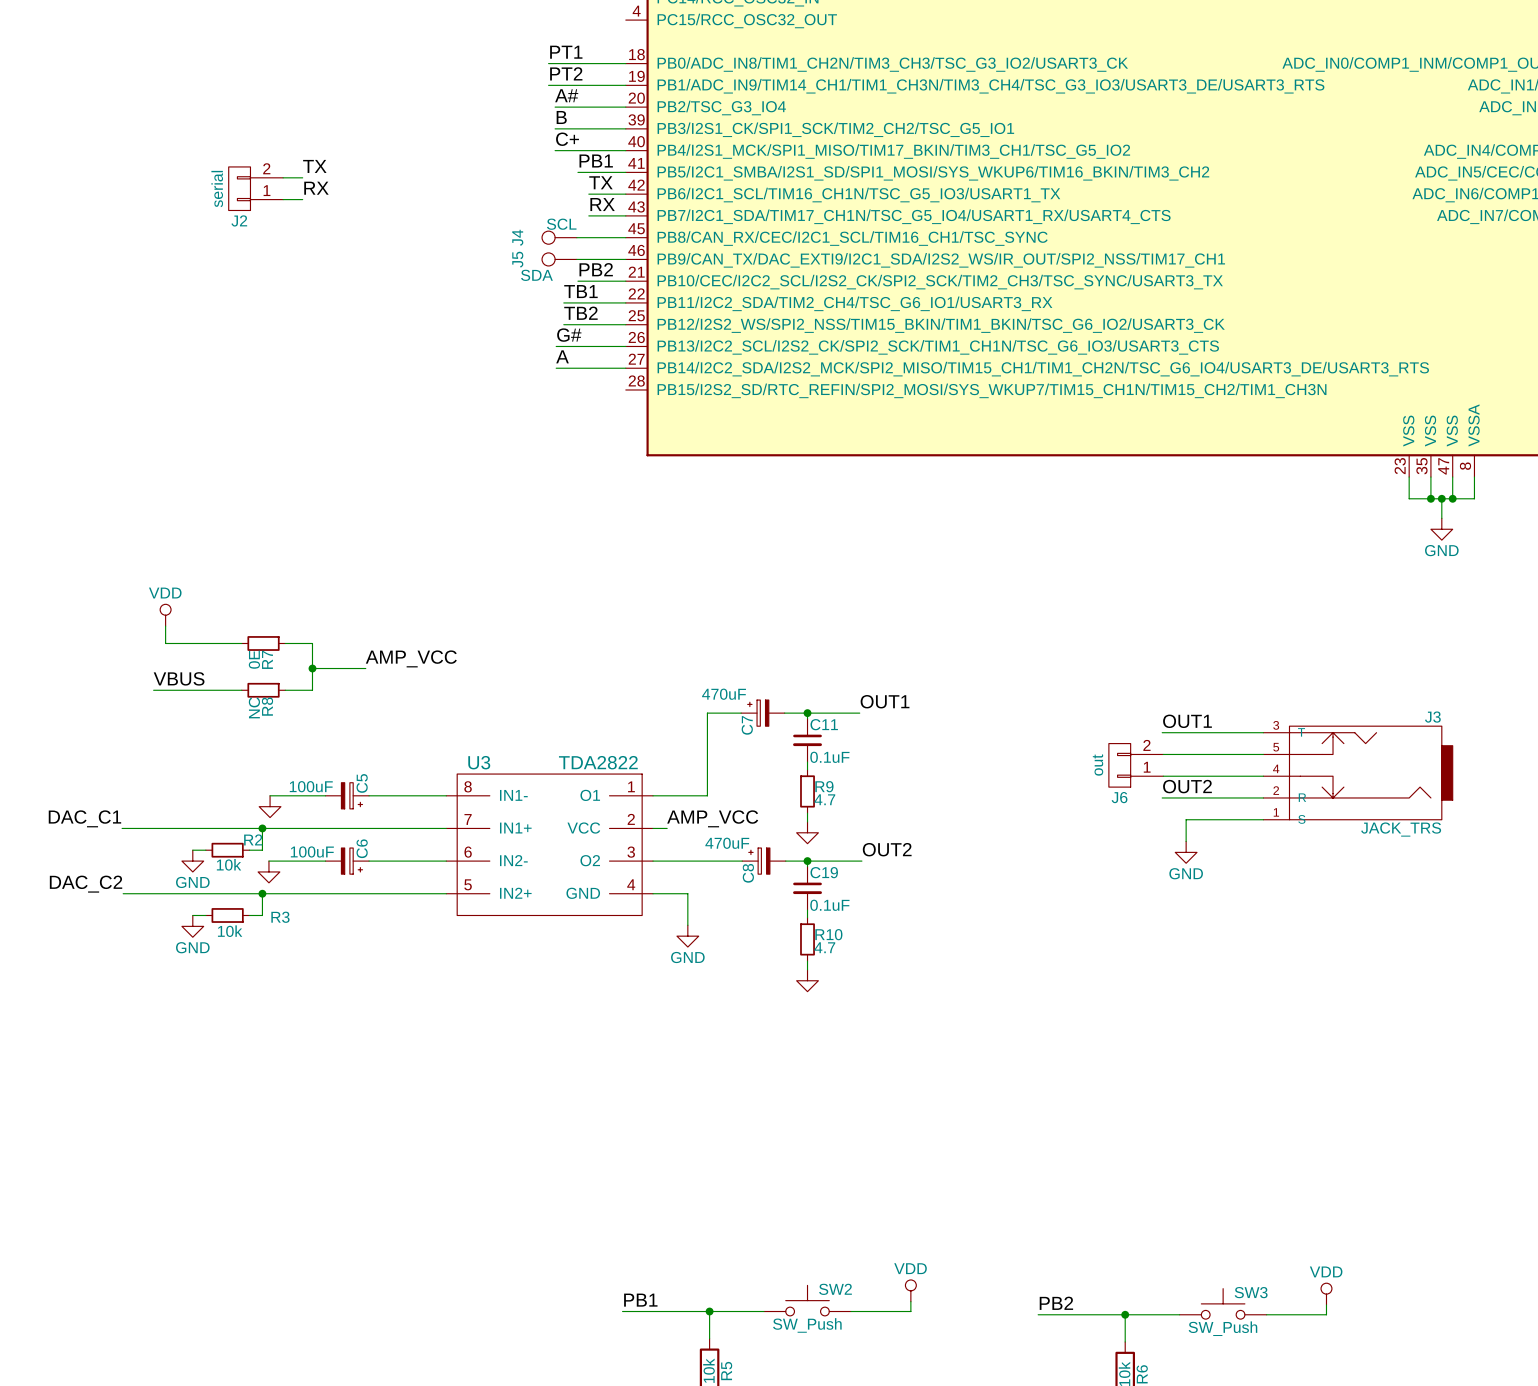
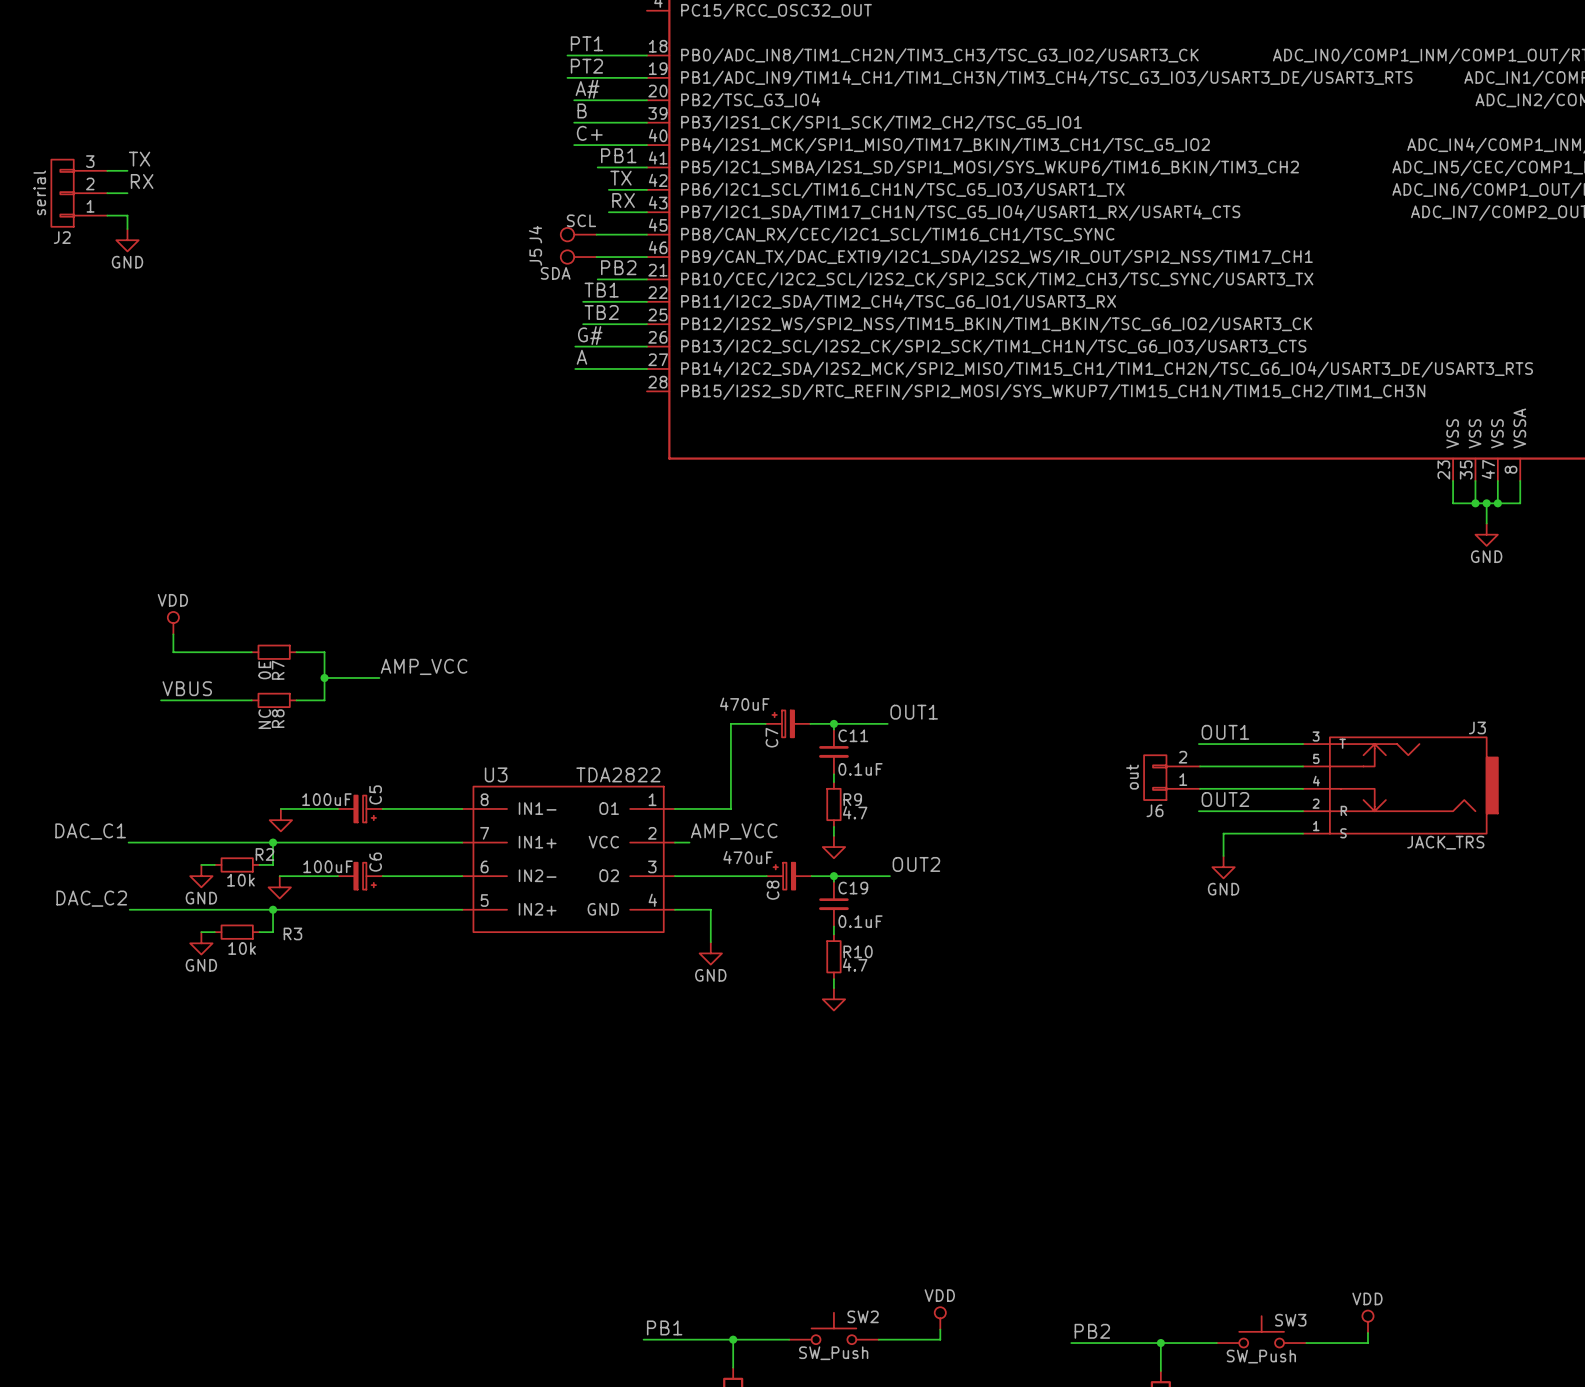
J2 symbol: [228, 166, 284, 211] -> [51, 159, 108, 227]
label position: TX (314, 166) -> TX (139, 159)
wire: (283, 177) (302, 177) -> (107, 170) (127, 170)
label position: RX (316, 188) -> RX (142, 181)
wire: (283, 199) (302, 199) -> (107, 193) (127, 193)
wire: none -> (107, 215) (127, 215) (127, 229)
power symbol: none -> GND (127, 240)

